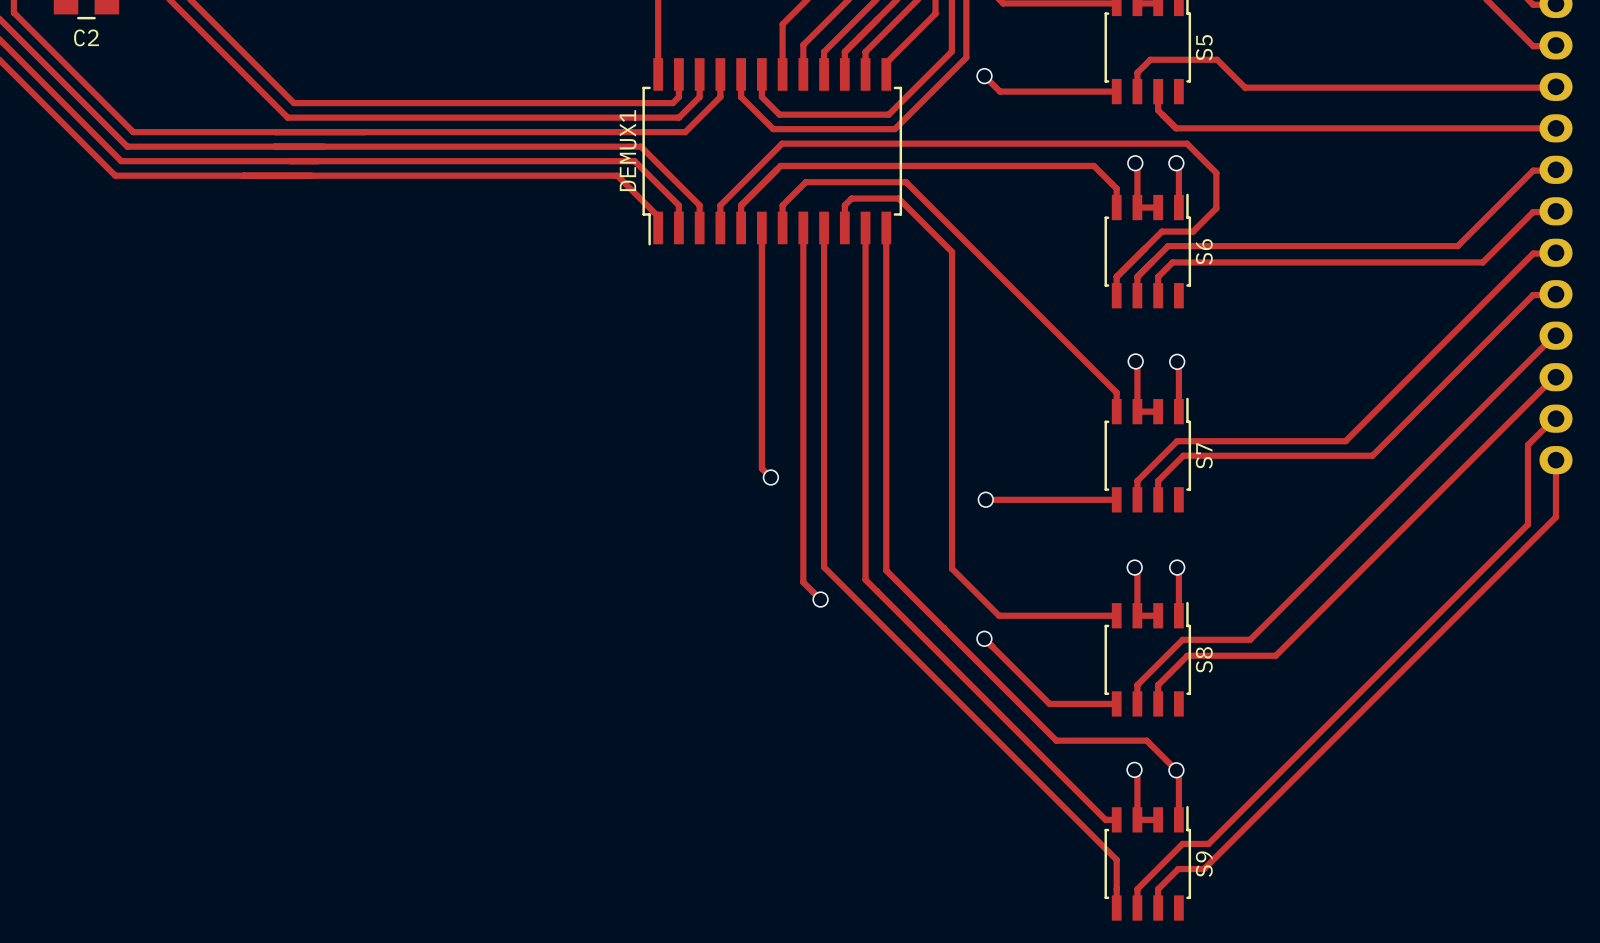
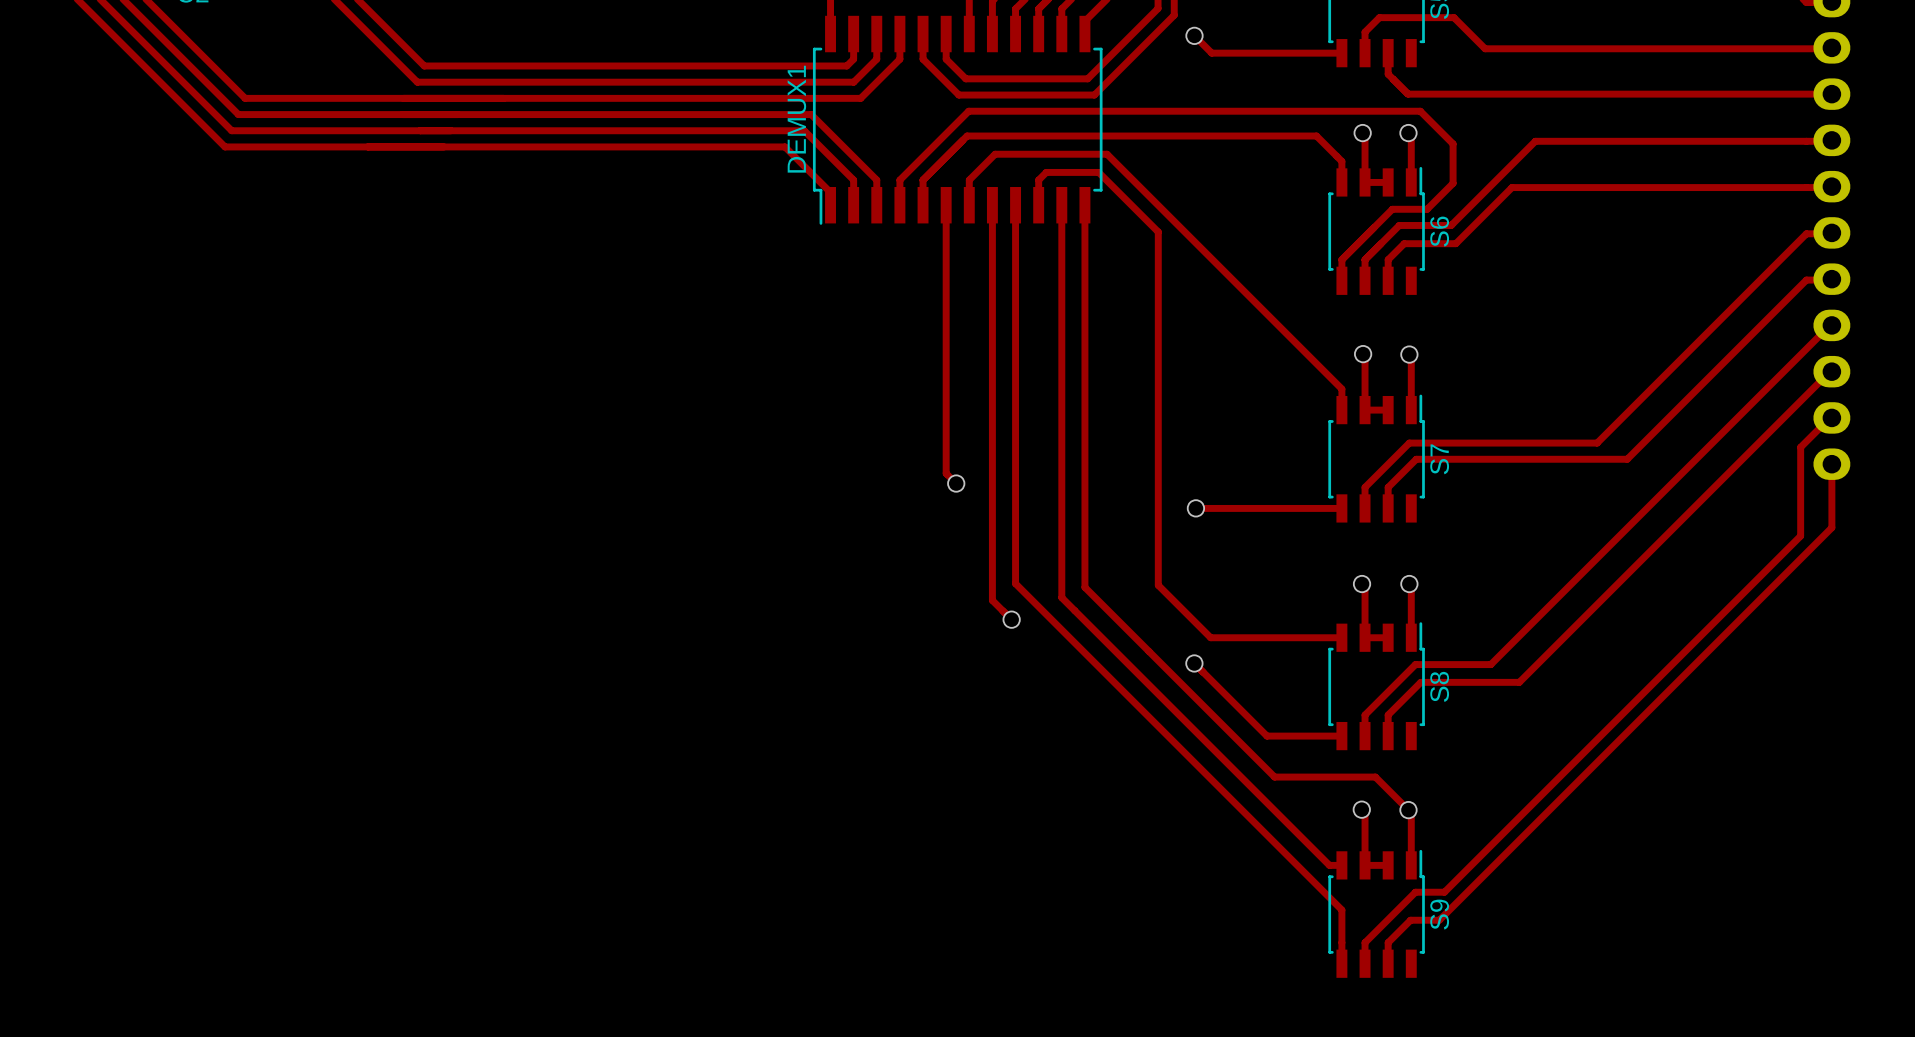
track: (1533, 170) (1457, 246) (1214, 246) -> (1806, 141) (1535, 141) (1451, 225)
track: (1533, 212) (1482, 262) (1218, 262) -> (1806, 187) (1511, 187) (1455, 243)

